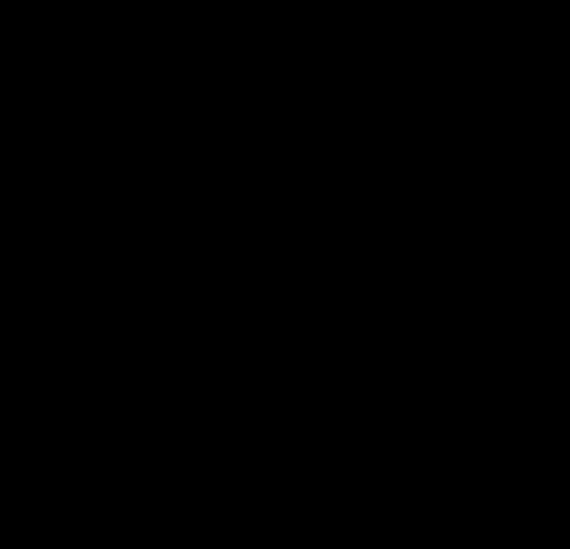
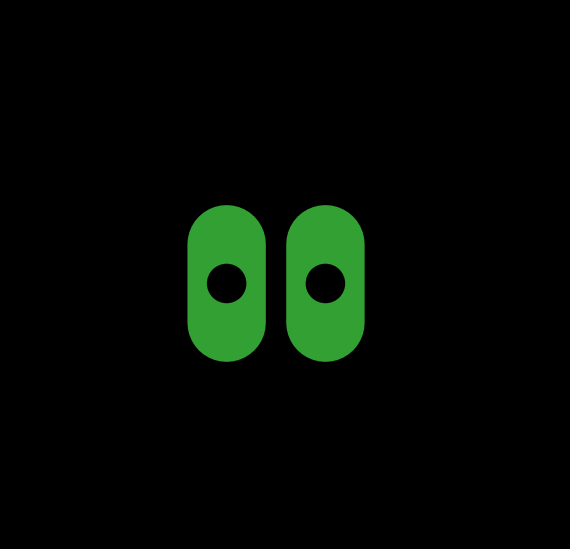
part: none -> (276, 283)

